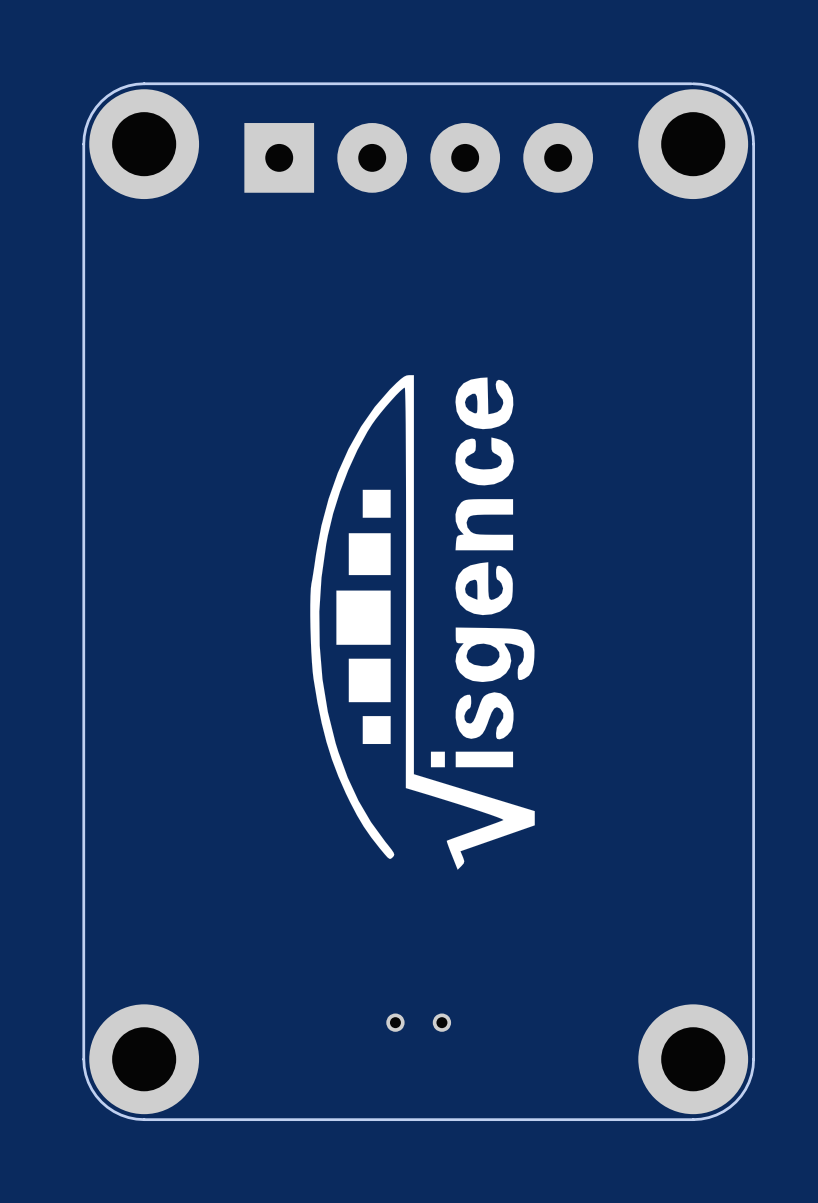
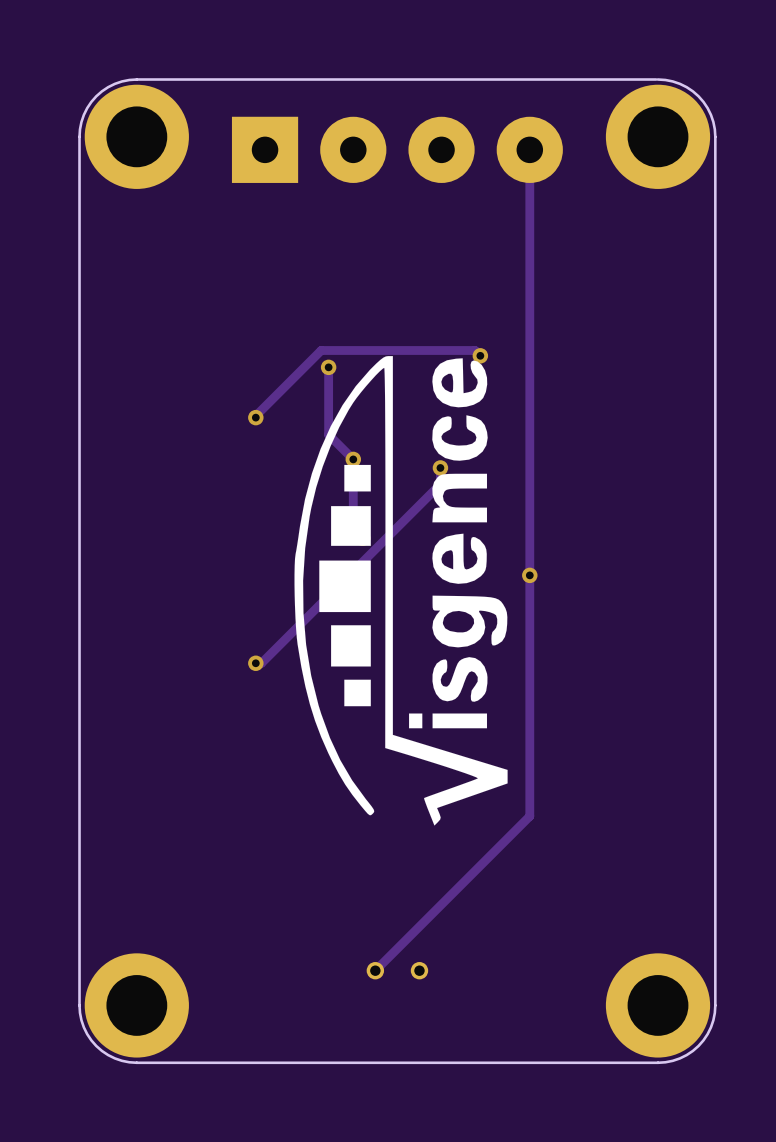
track: none -> (529, 149) (529, 816) (375, 970)
track: none -> (480, 355) (475, 350) (321, 350) (255, 417)
via: none -> (480, 355)
track: none -> (328, 367) (328, 434) (353, 459) (353, 528) (362, 538)
via: none -> (328, 367)
via: none -> (255, 417)
via: none -> (353, 459)
track: none -> (440, 467) (440, 484) (261, 663) (255, 663)
via: none -> (440, 467)
via: none -> (529, 575)
via: none -> (255, 663)

